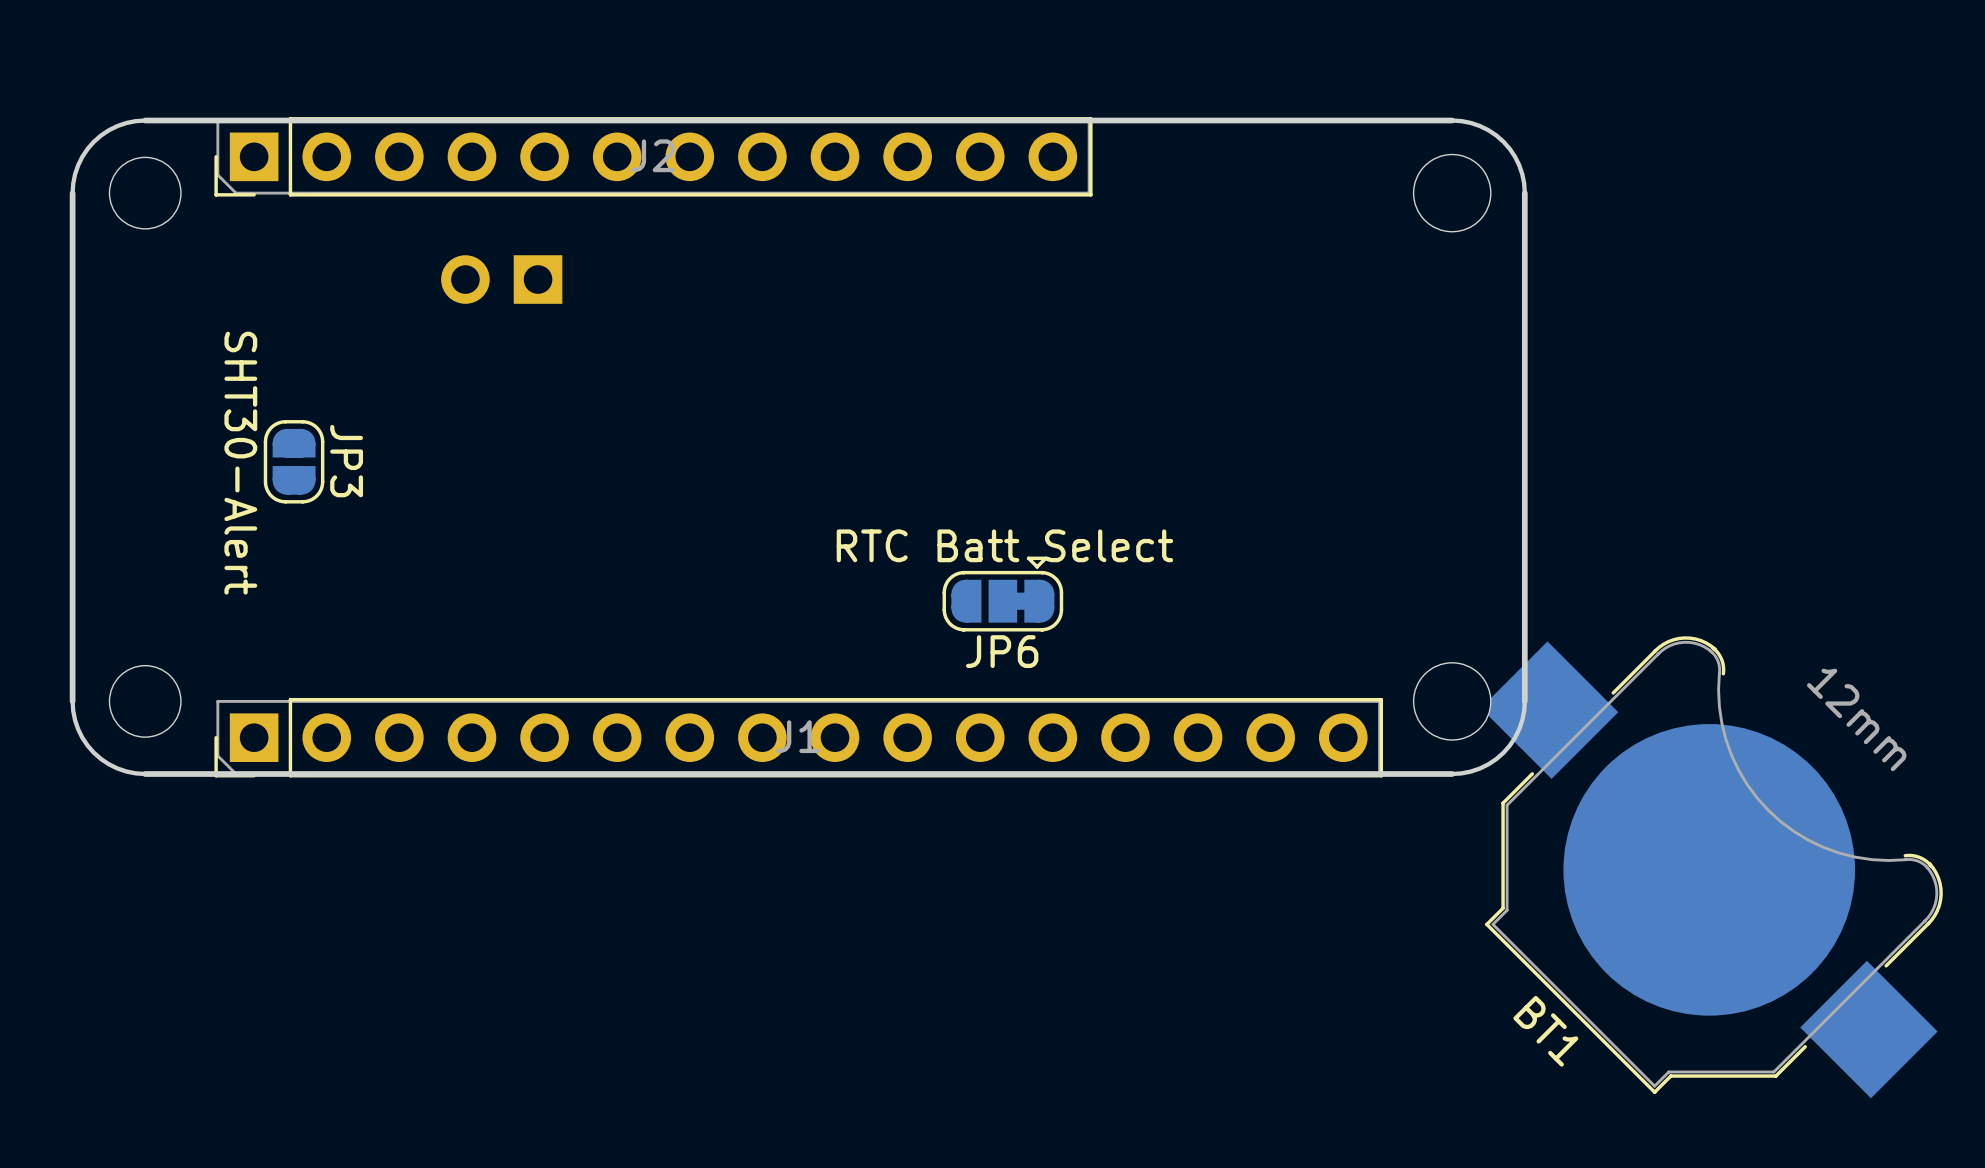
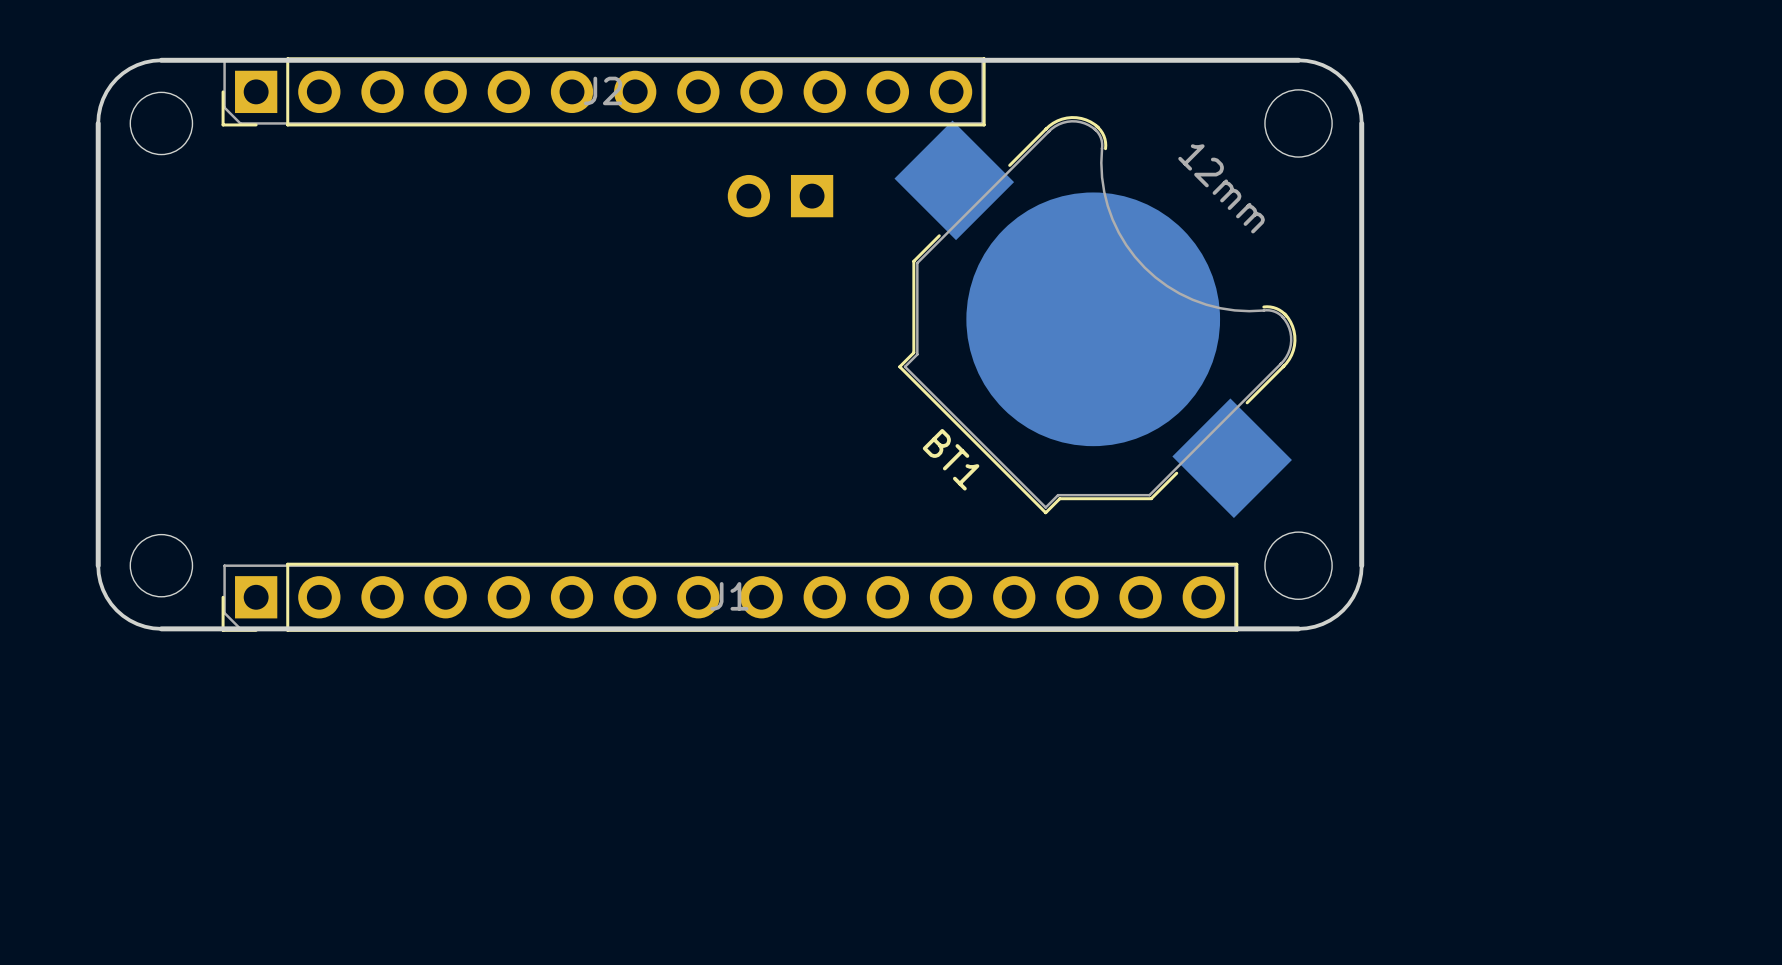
part position: (501, 279) -> (780, 196)
JP3: SHT30-Alert (294, 461) -> none
JP6: RTC Batt Select (1002, 594) -> none
BT1 position: (1711, 867) -> (1095, 317)

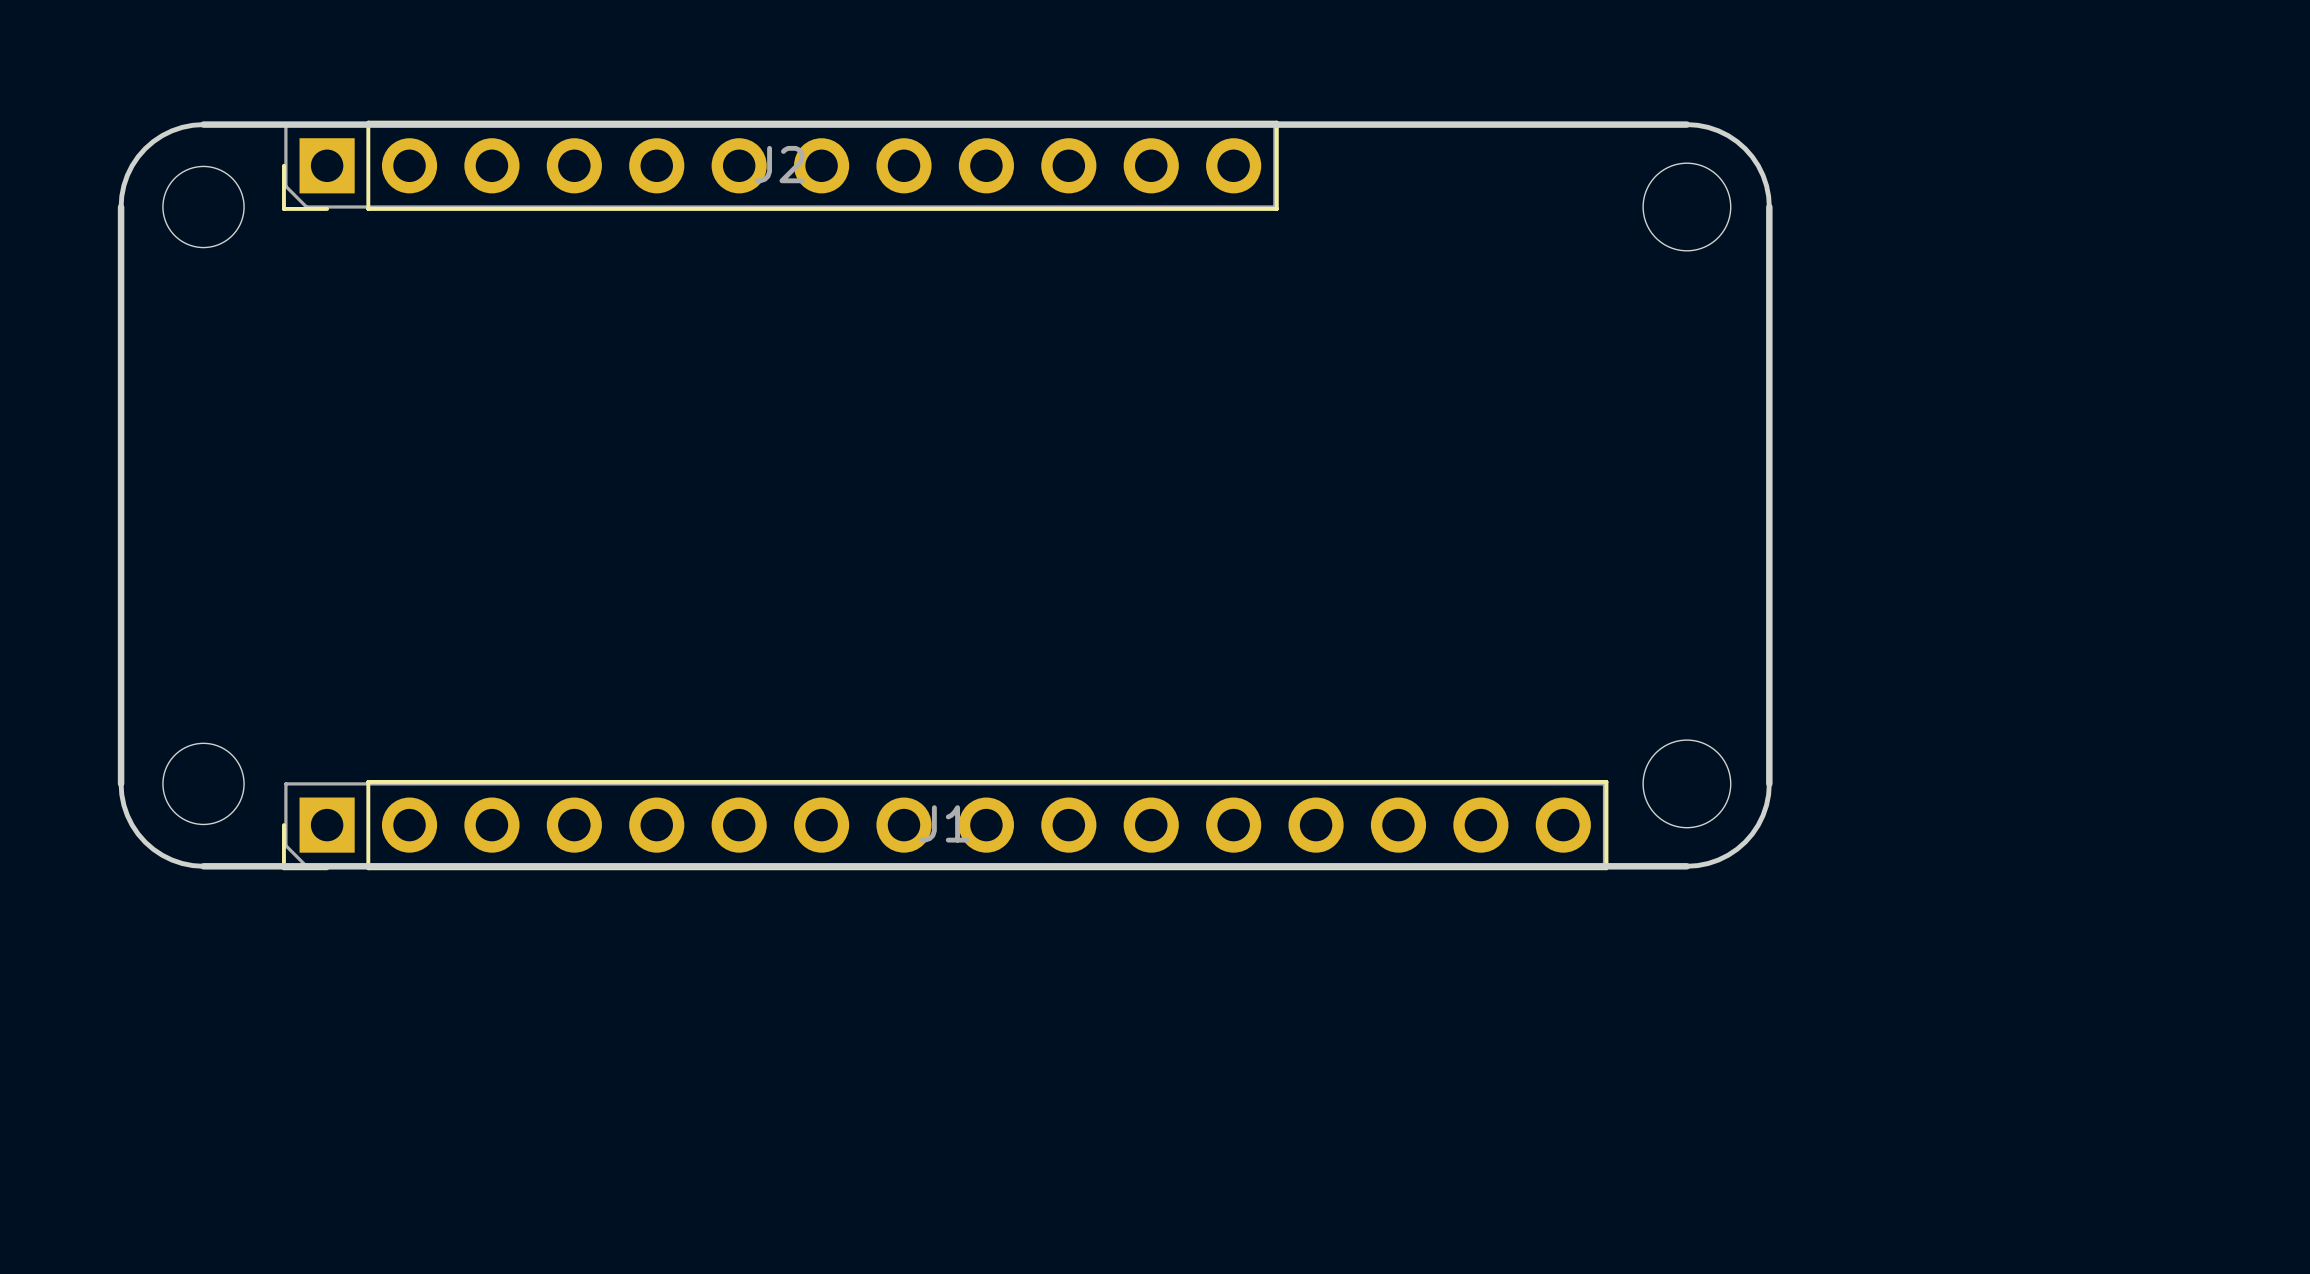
part: (780, 196) -> none
BT1: 12mm (1095, 317) -> none

